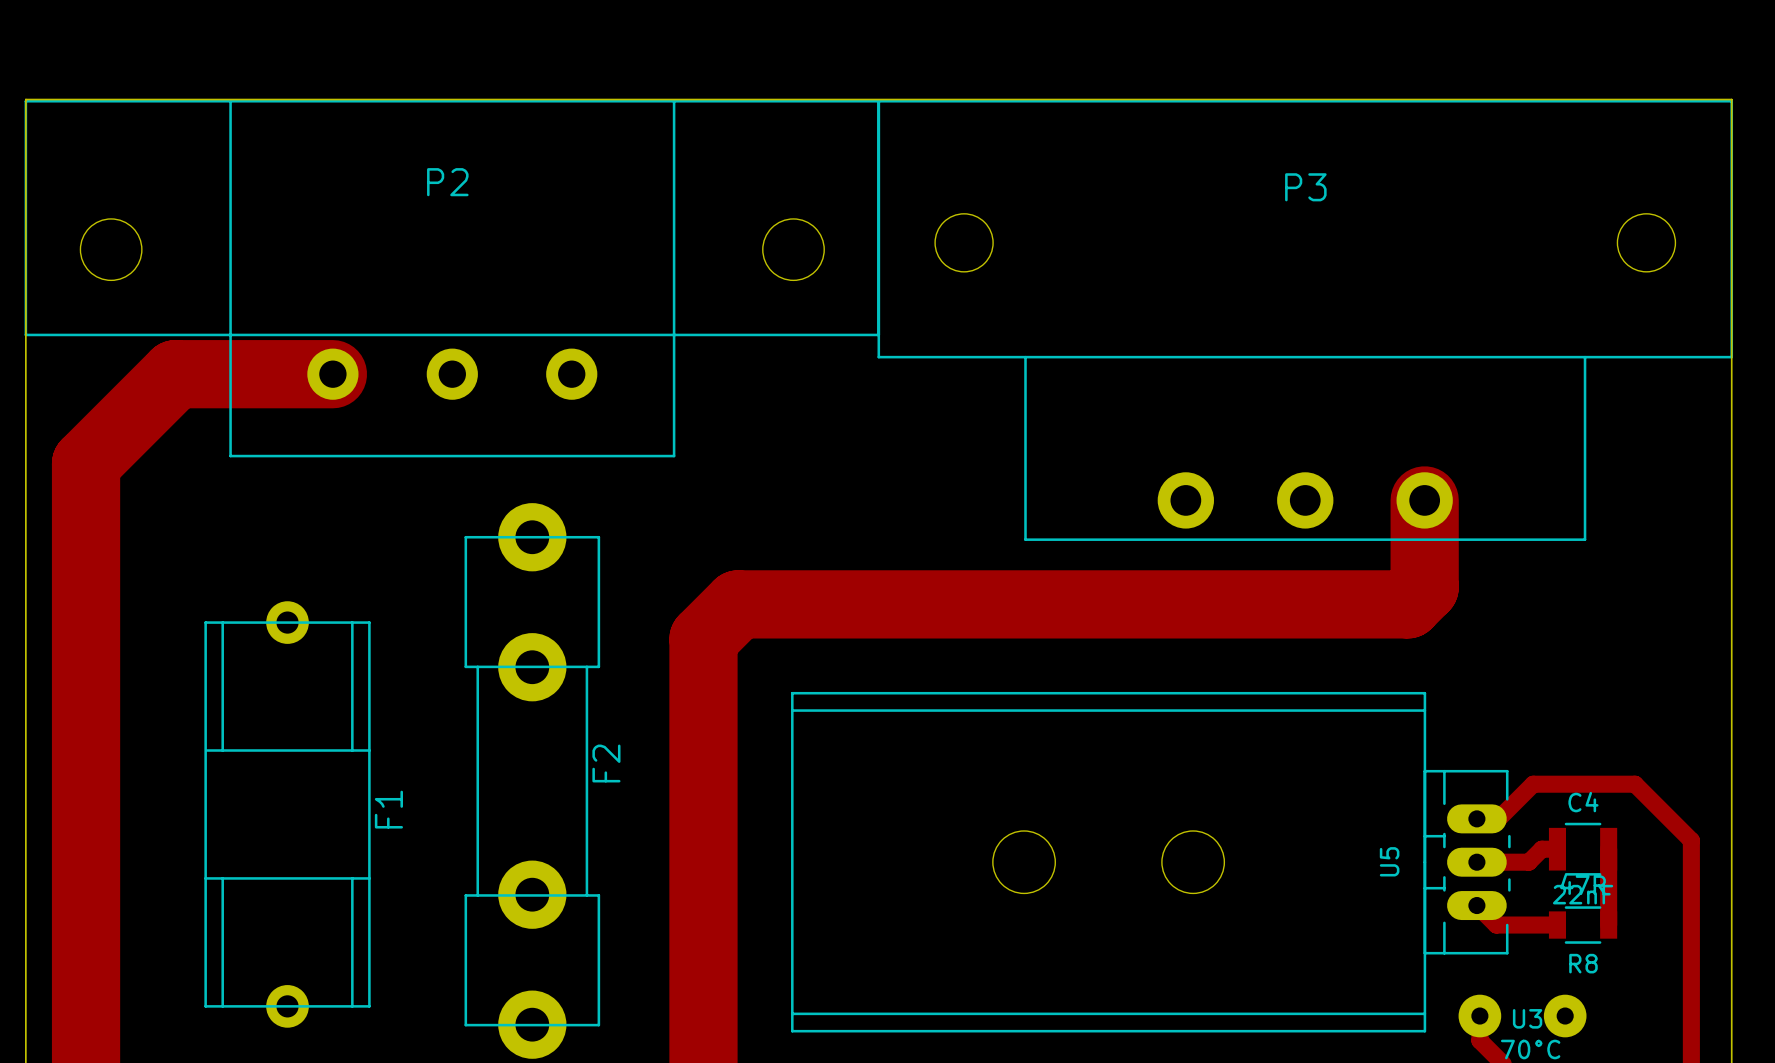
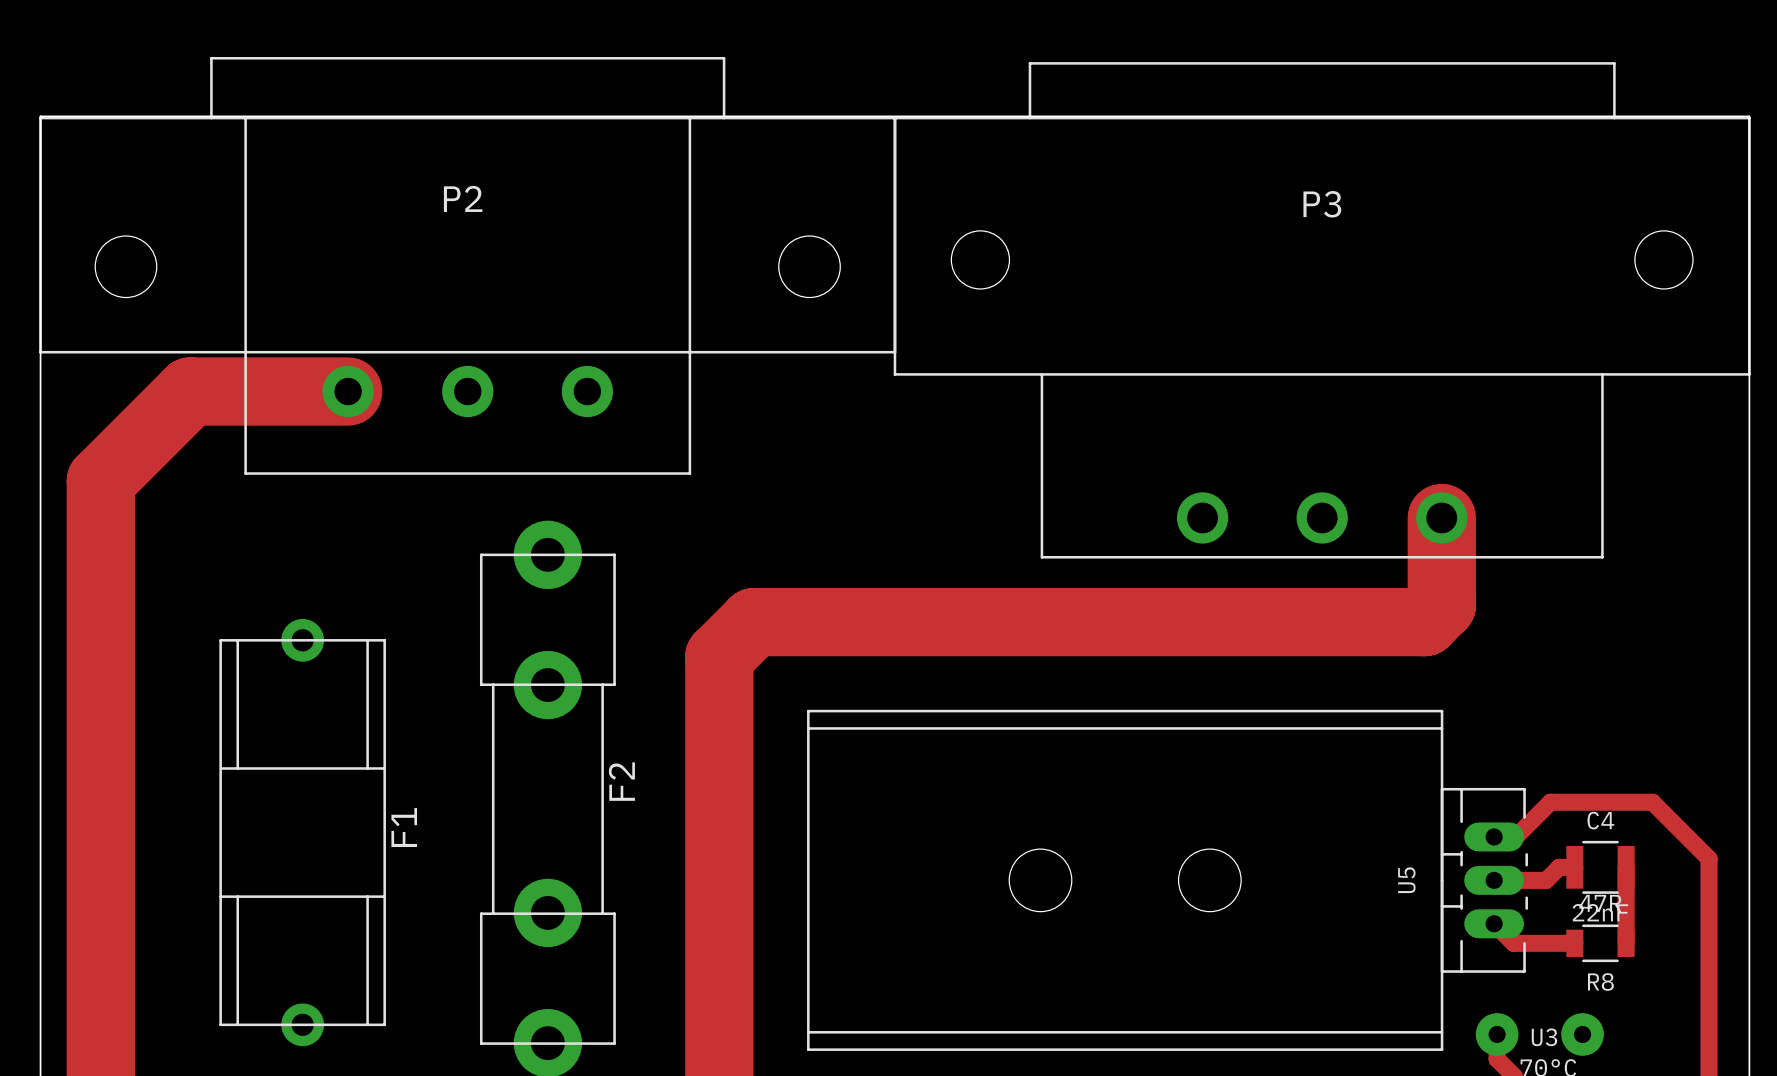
P2 footprint: [24, 99, 881, 458] -> [39, 57, 897, 475]
P3 footprint: [877, 99, 1734, 541] -> [893, 62, 1751, 559]

